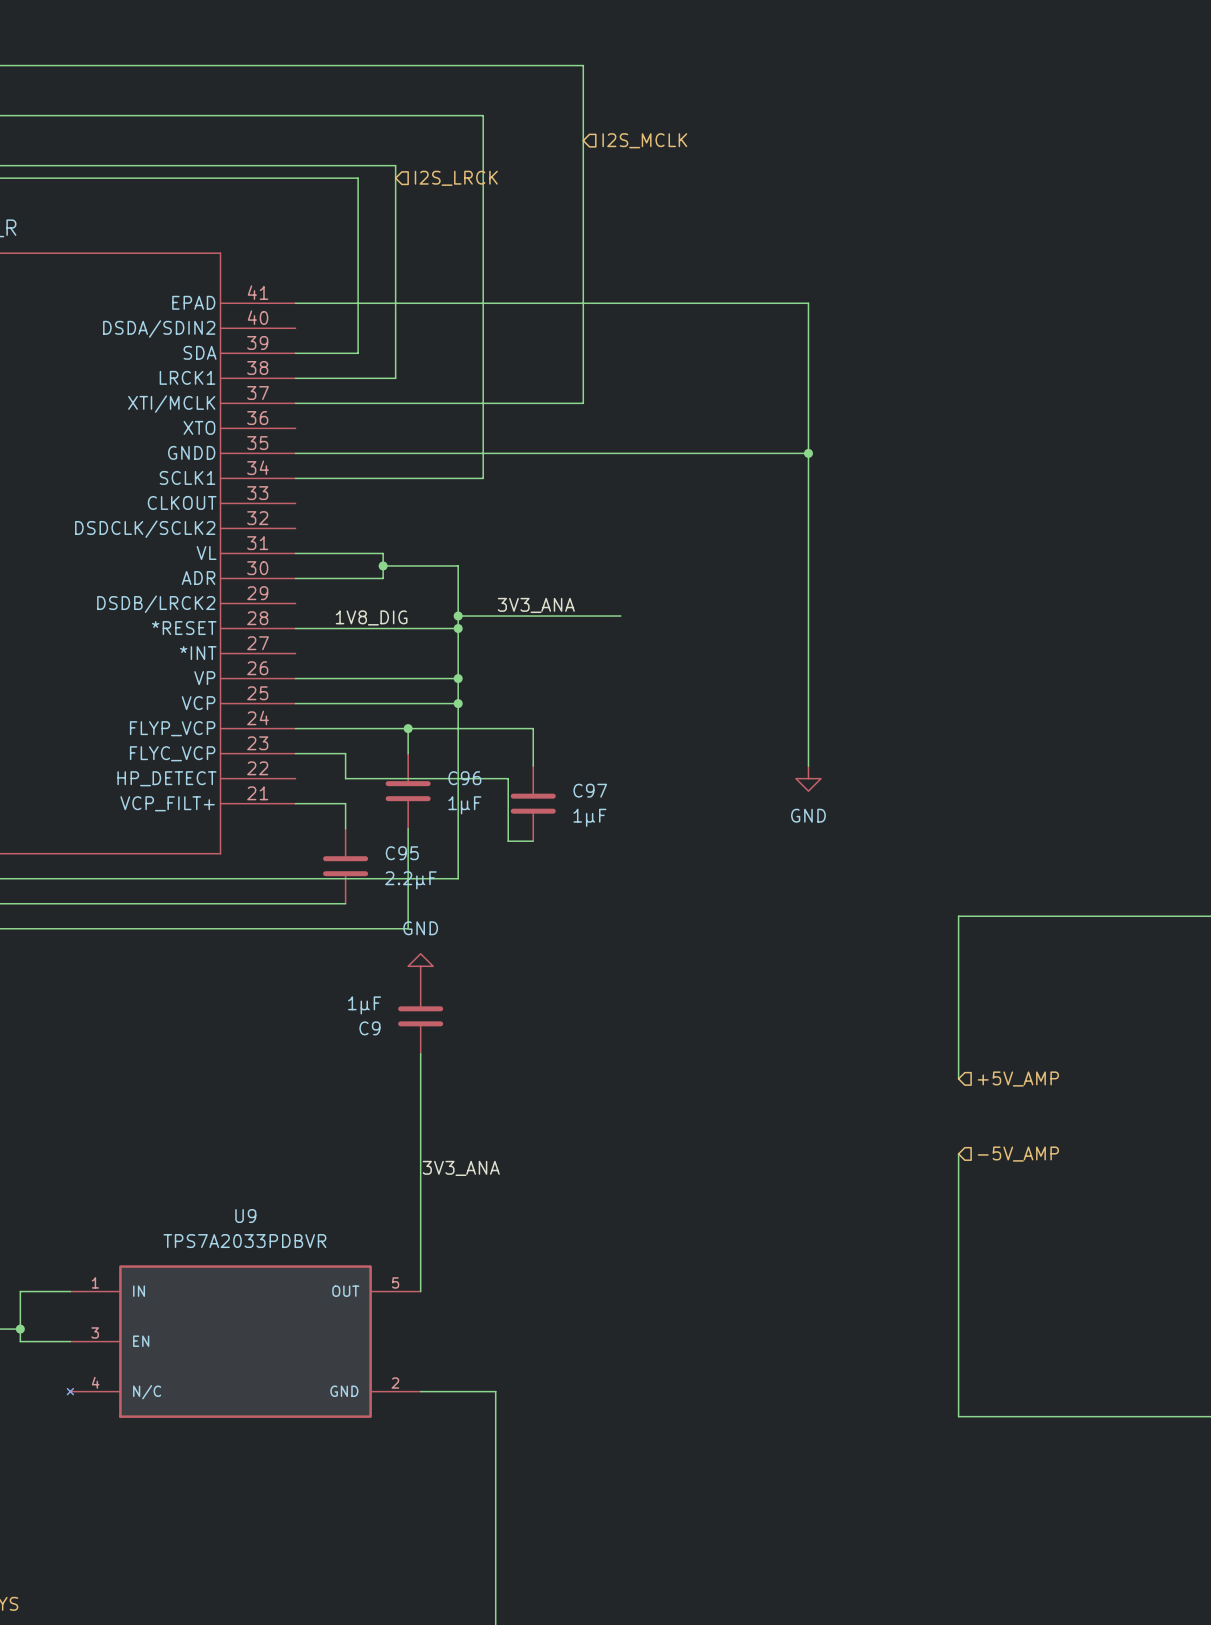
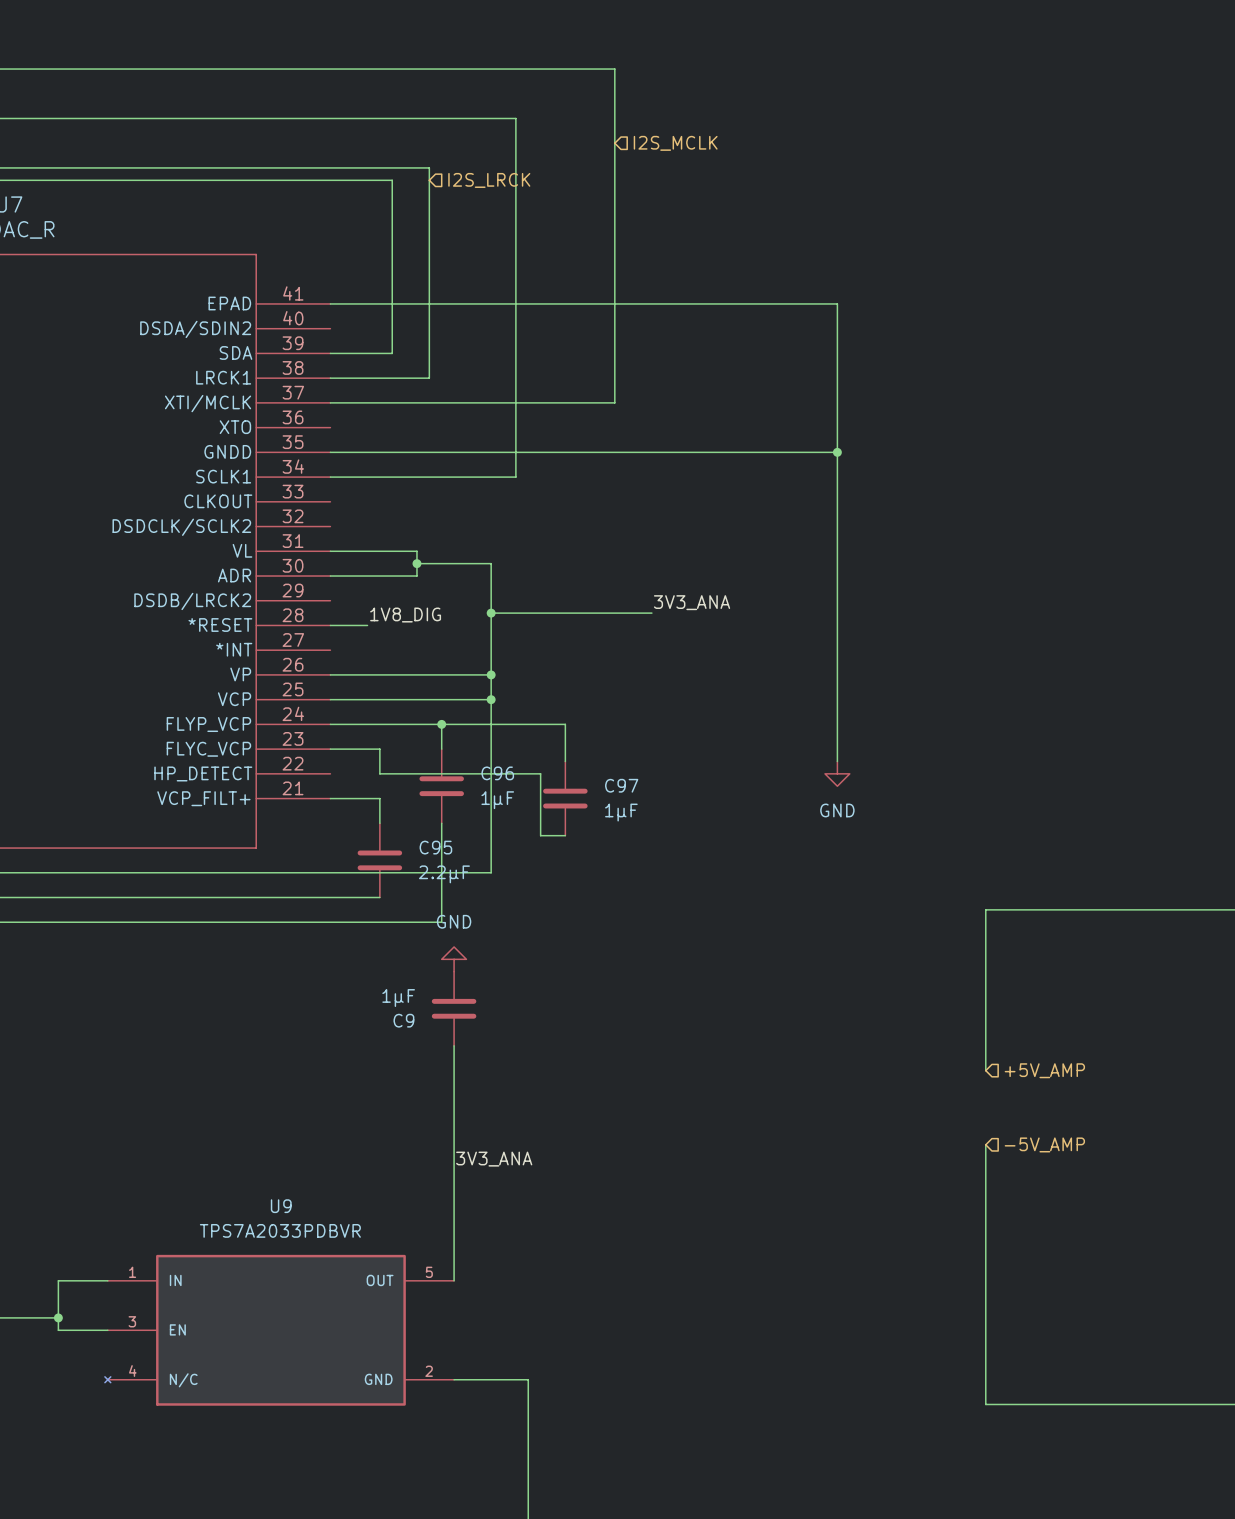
label position: 3V3_ANA (536, 605) -> 3V3_ANA (692, 602)
wire: (333, 628) (458, 628) -> none
junction: (458, 628) -> none

